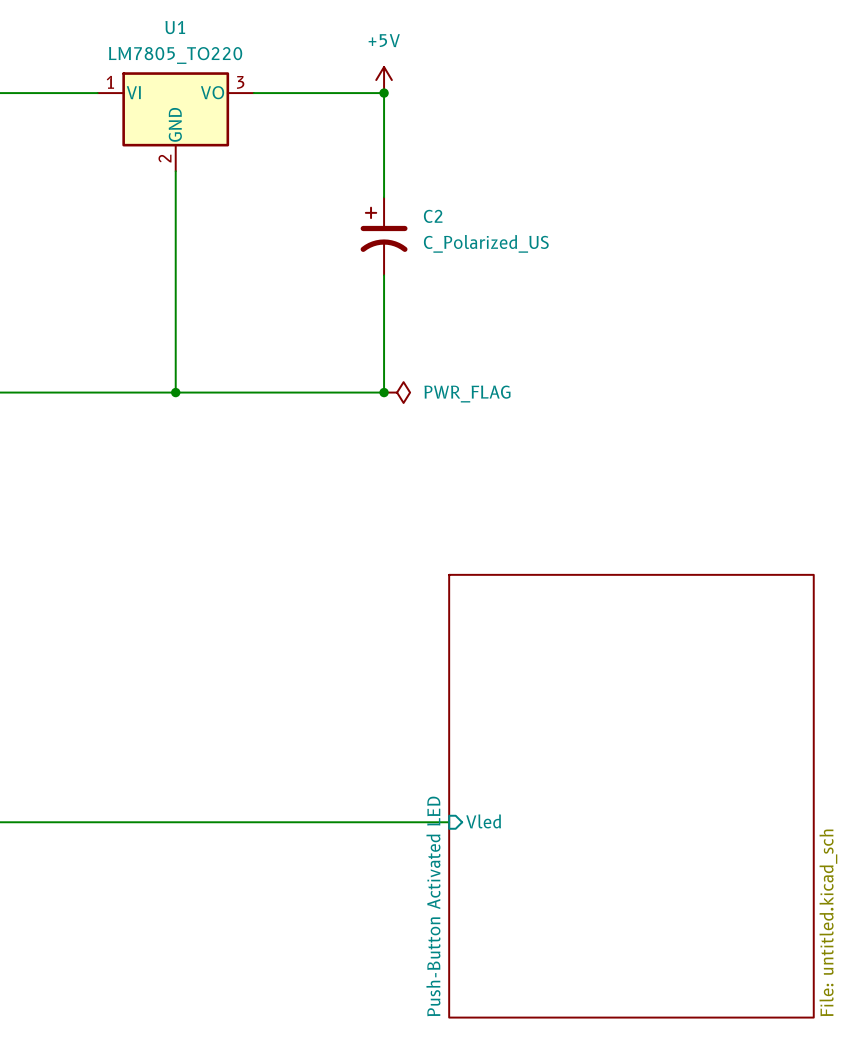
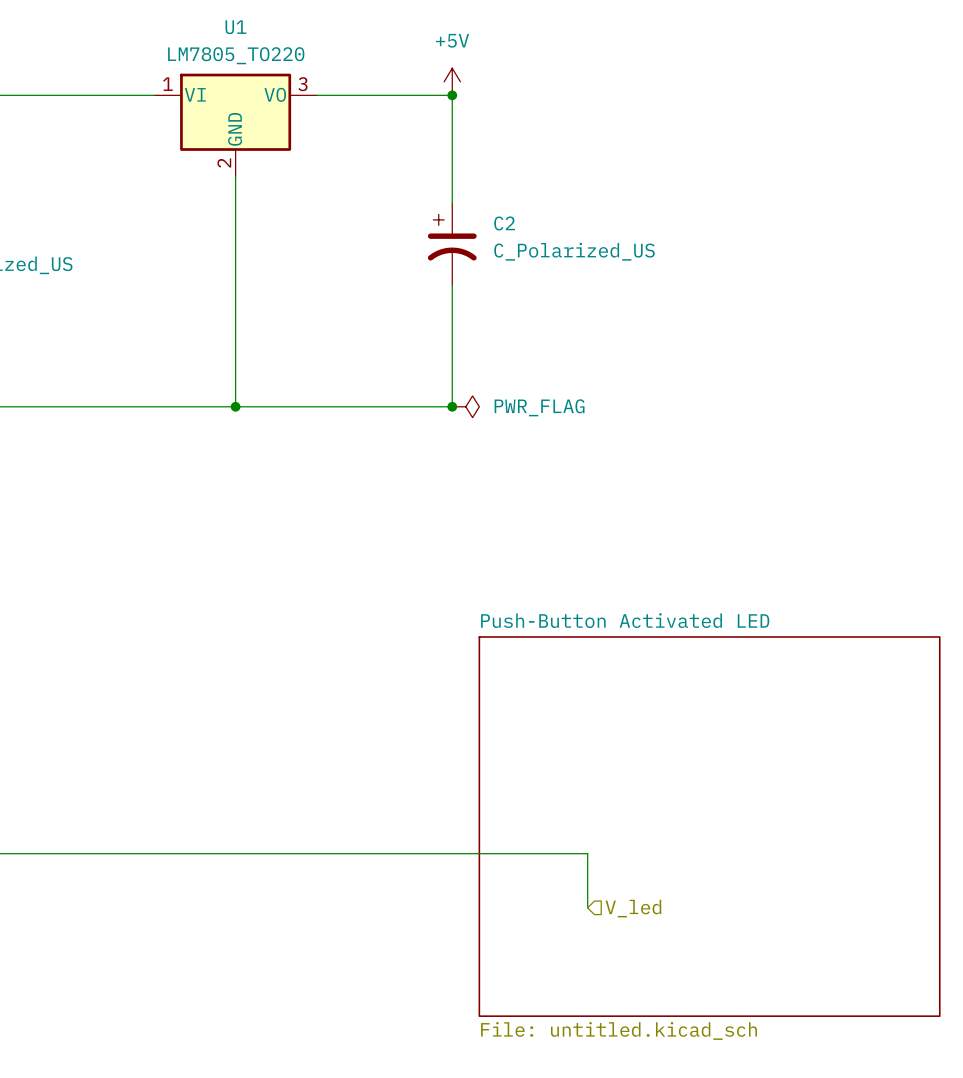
sheet Push-Button Activated LED rotation: 0° (631, 796) -> 90° clockwise (709, 826)
sheet pin: Vled (483, 821) -> none
wire: none -> (519, 853) (587, 853) (587, 907)
hierarchical label: none -> V_led (633, 908)

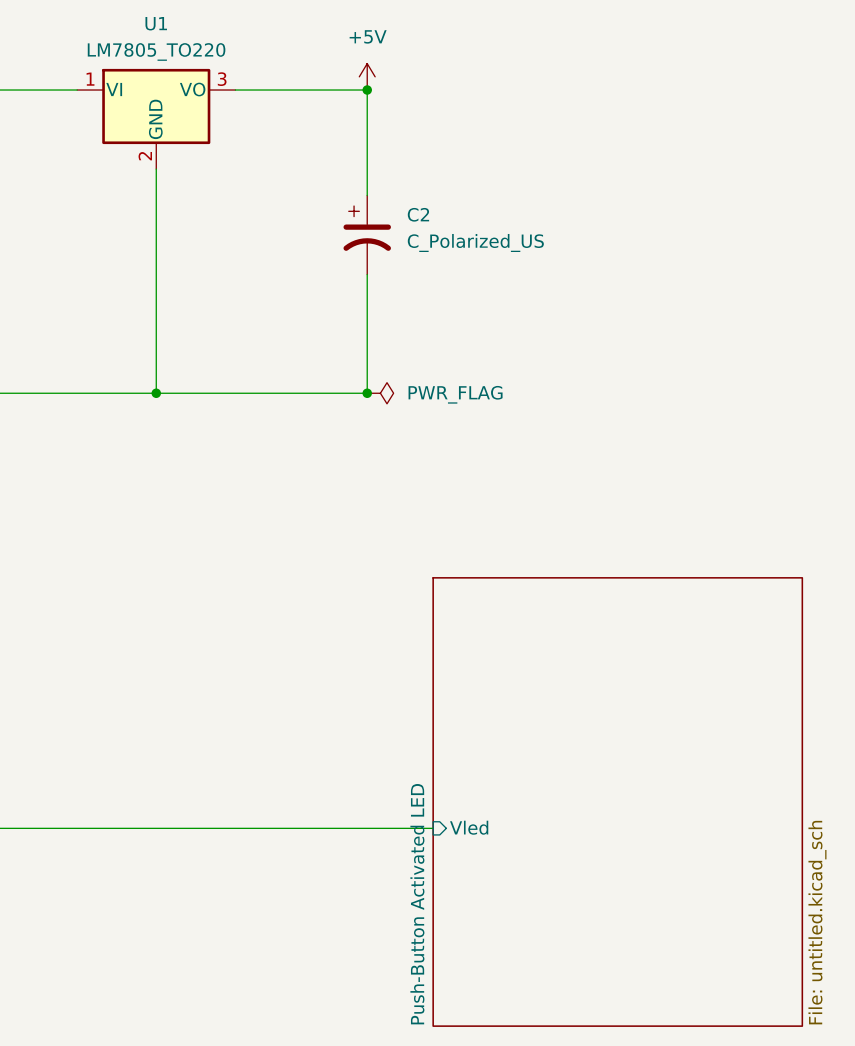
sheet Push-Button Activated LED name position: Push-Button Activated LED (625, 620) -> Push-Button Activated LED (417, 904)
sheet Push-Button Activated LED rotation: 0° (709, 826) -> 90° clockwise (617, 801)
sheet pin: none -> Vled (469, 827)
wire: (519, 853) (587, 853) (587, 907) -> none
hierarchical label: V_led (633, 908) -> none
sheet Push-Button Activated LED value position: File: untitled.kicad_sch (619, 1030) -> File: untitled.kicad_sch (817, 922)

